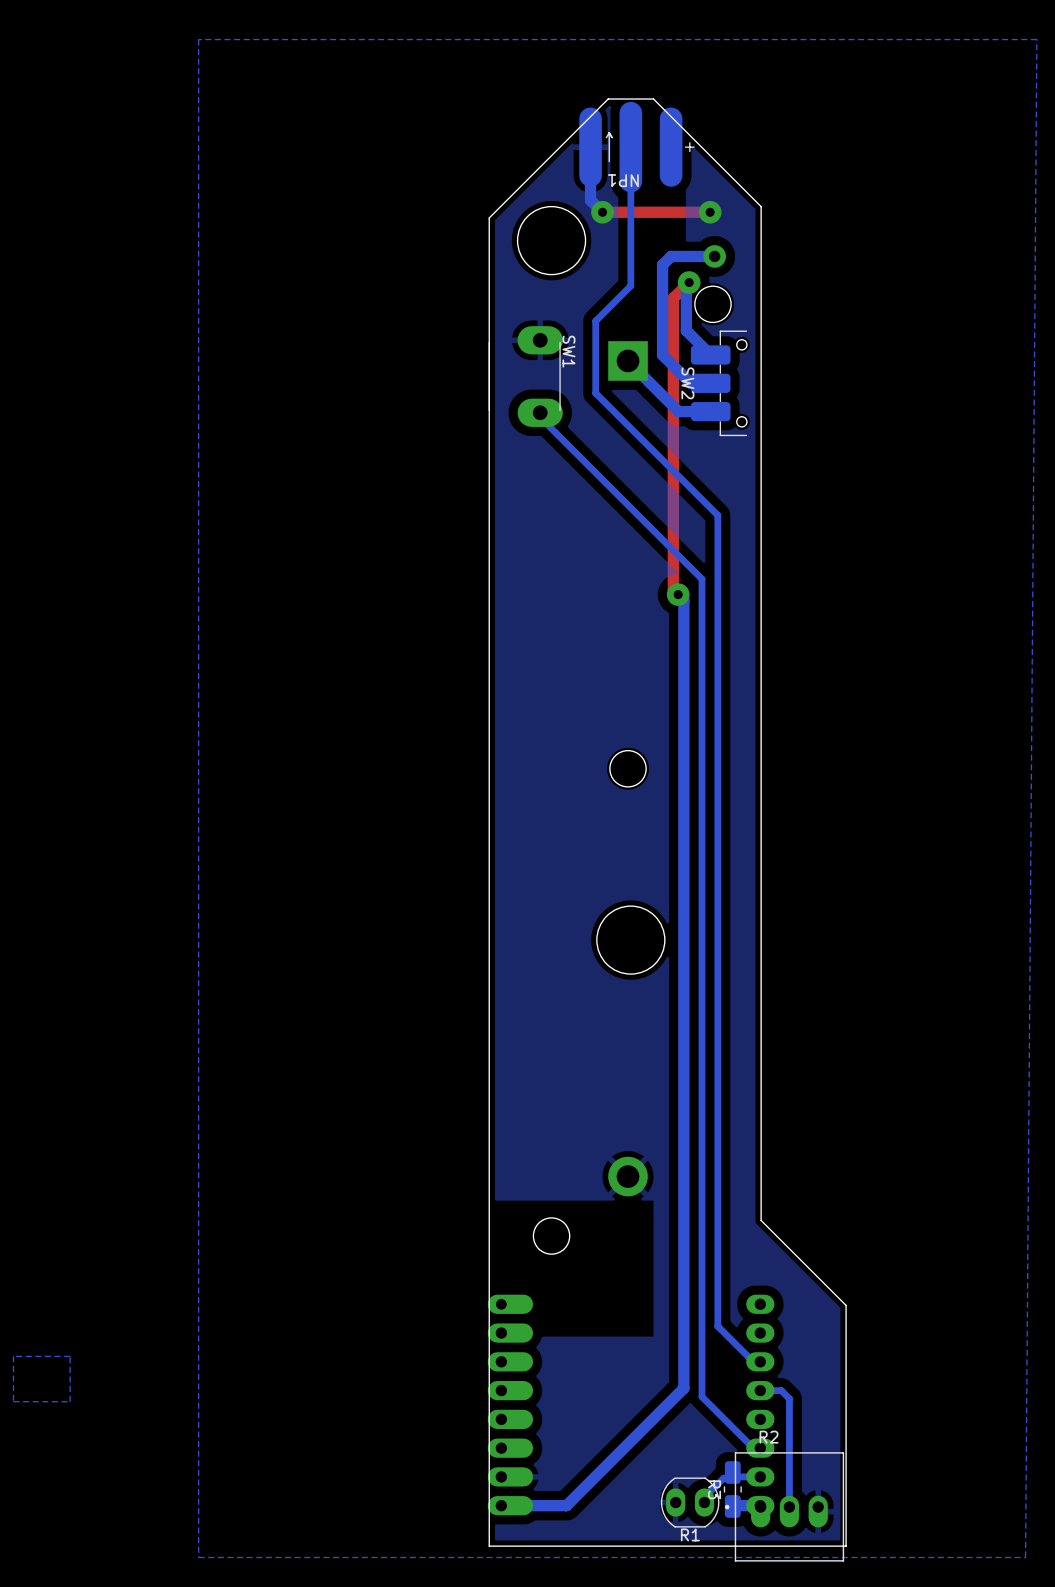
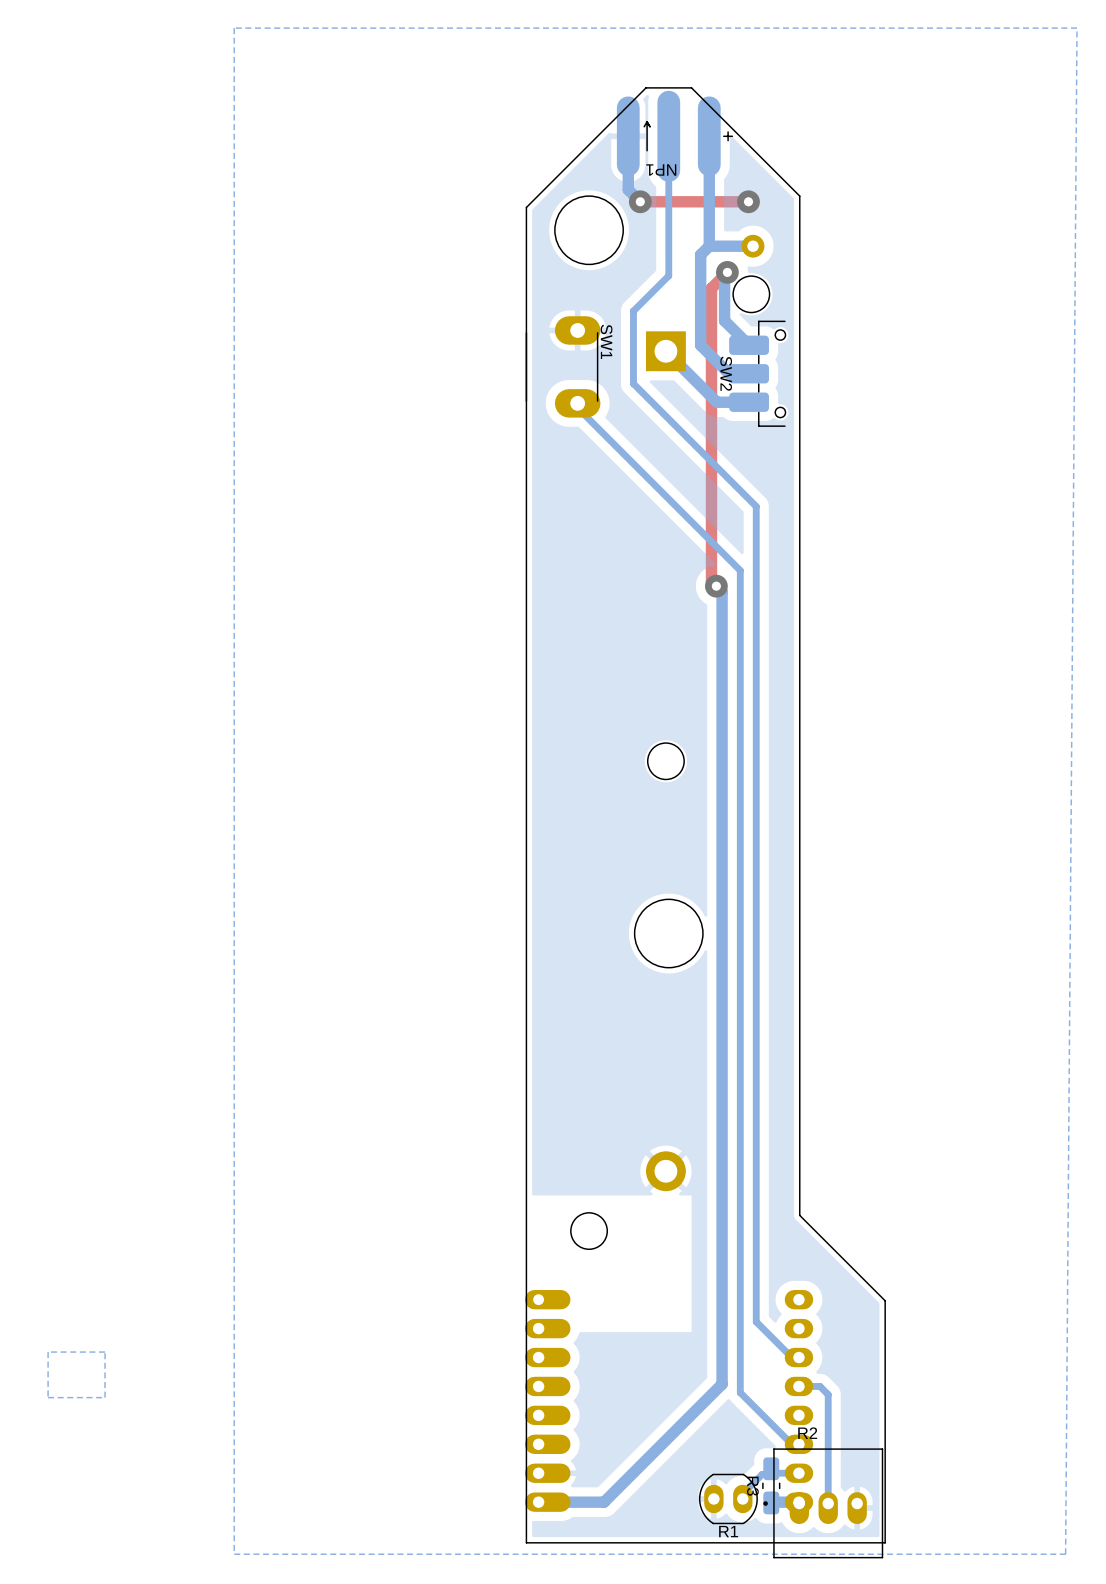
bottom track: none -> (709, 136) (709, 246)

